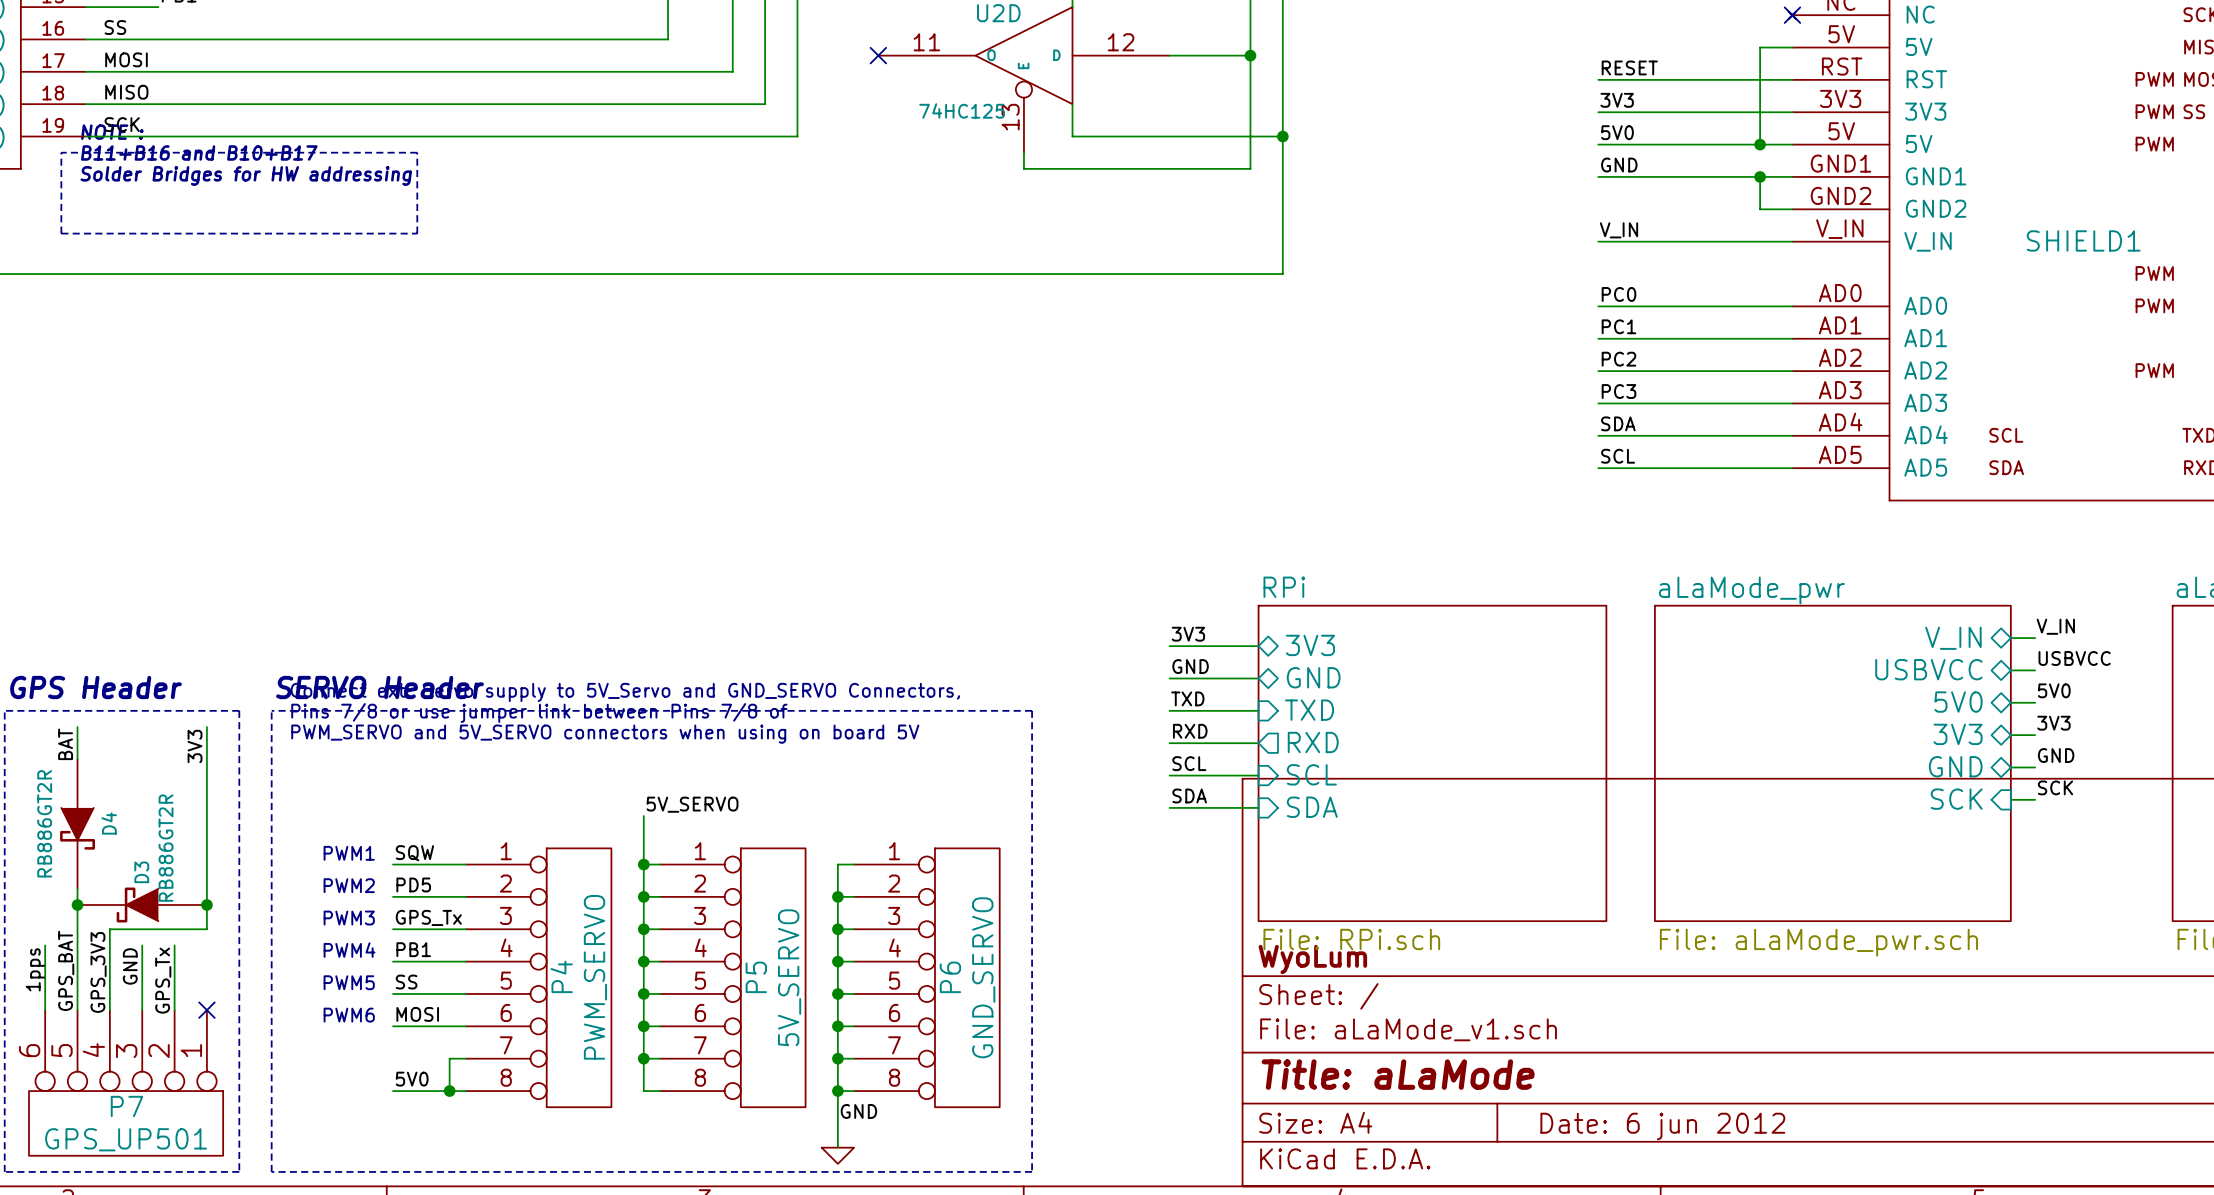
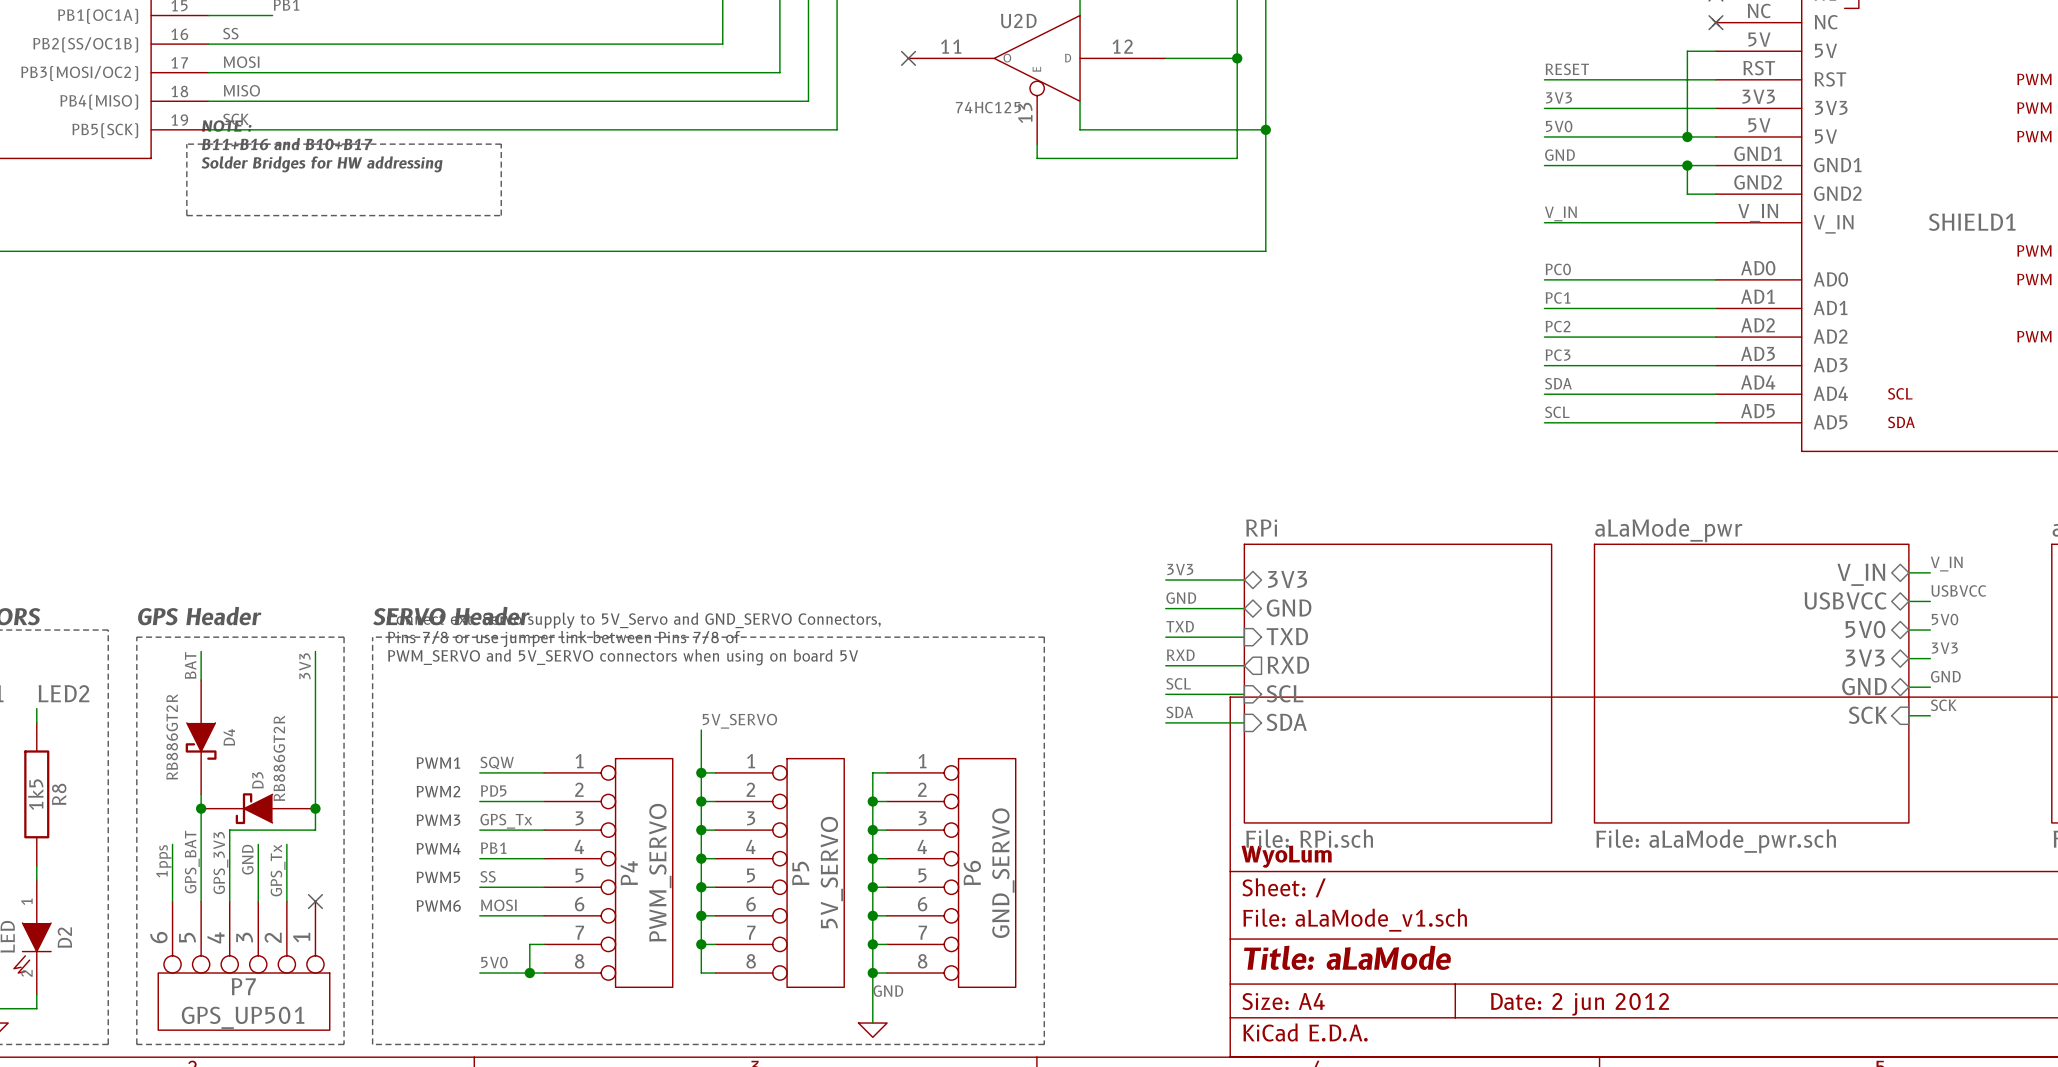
title block: Date: 6 jun 2012 (1662, 1126) -> Date: 2 jun 2012 (1579, 1004)

